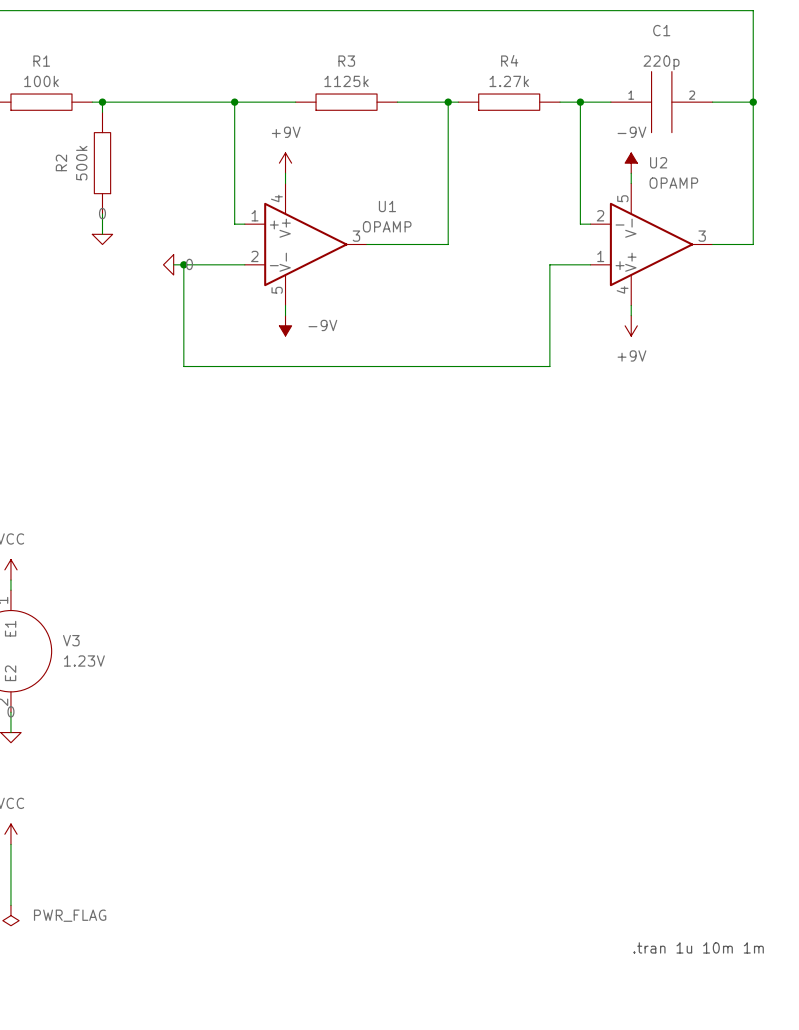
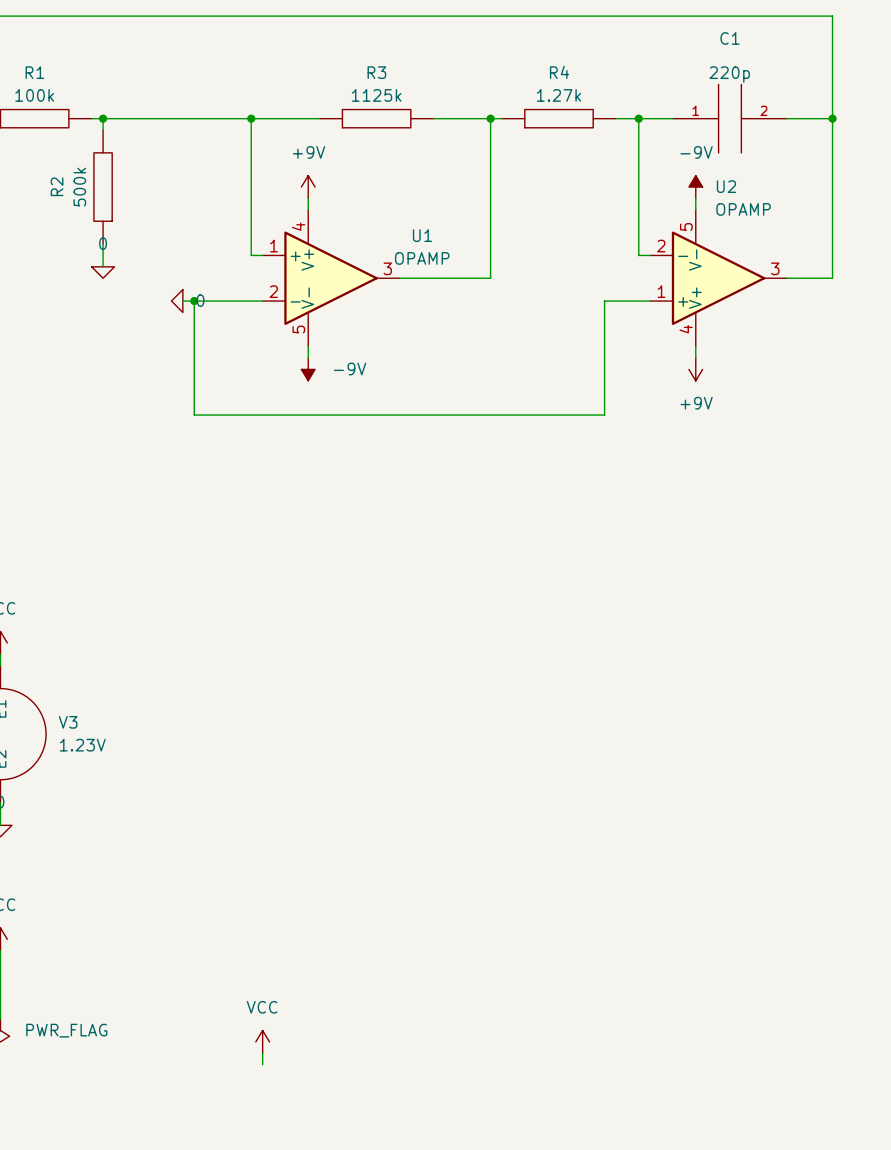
power symbol: none -> VCC (262, 1041)
wire: none -> (262, 1053) (262, 1064)
text: .tran 1u 10m 1m (698, 947) -> none

